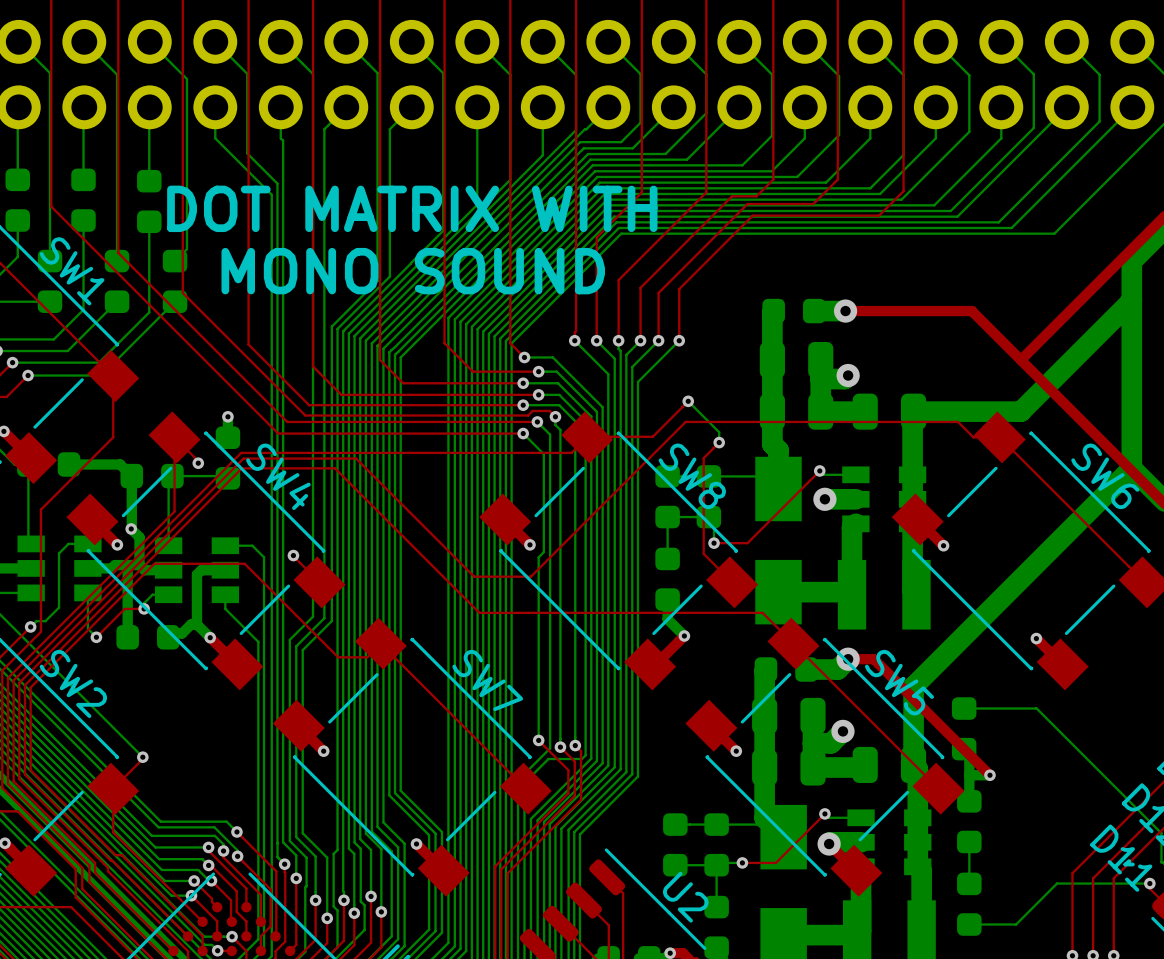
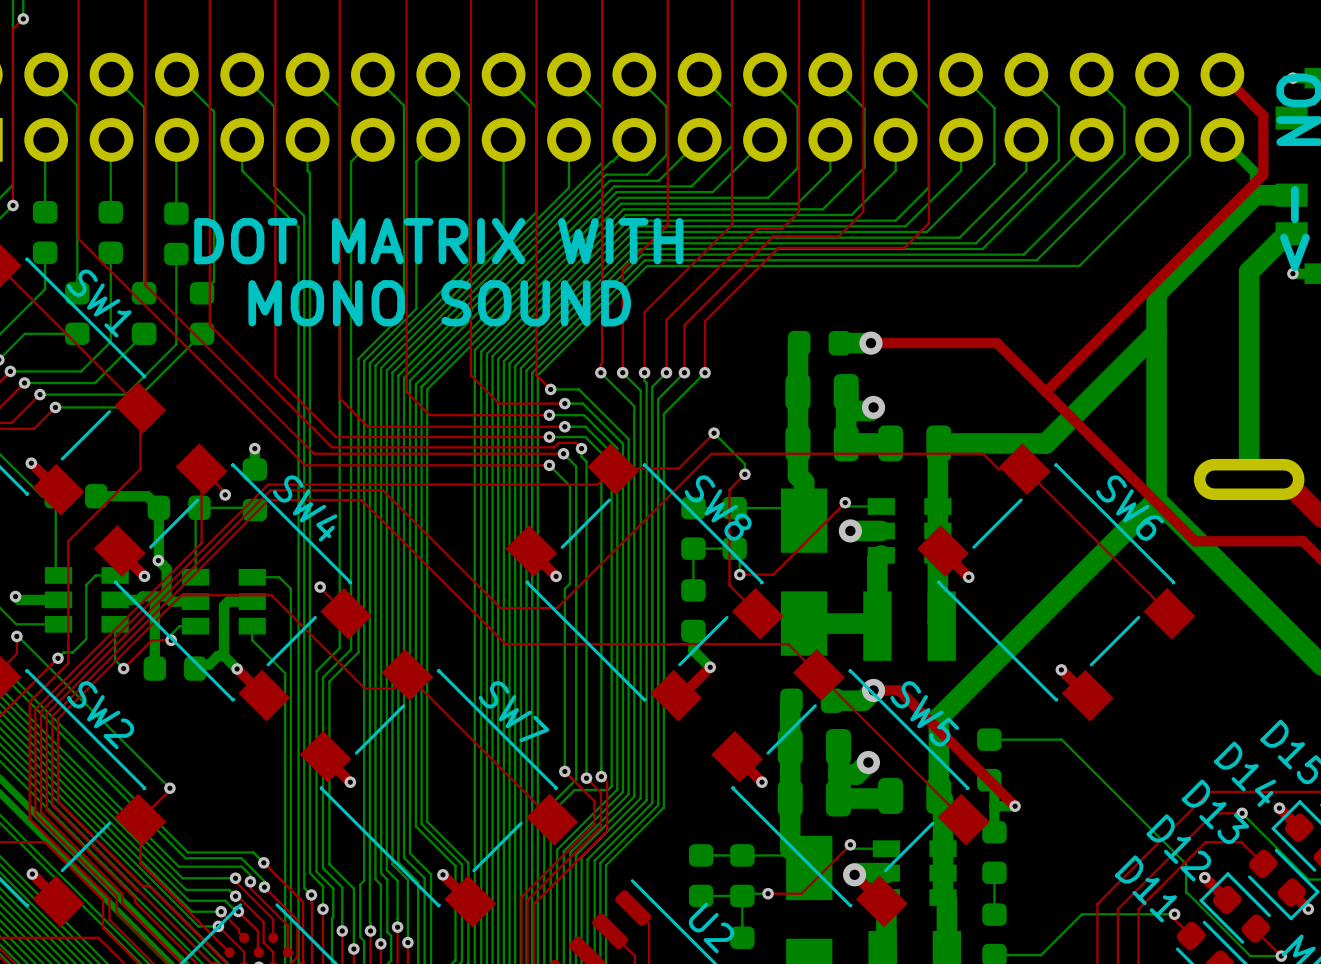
line: (1129, 861) (1125, 864) (1132, 864) -> none

